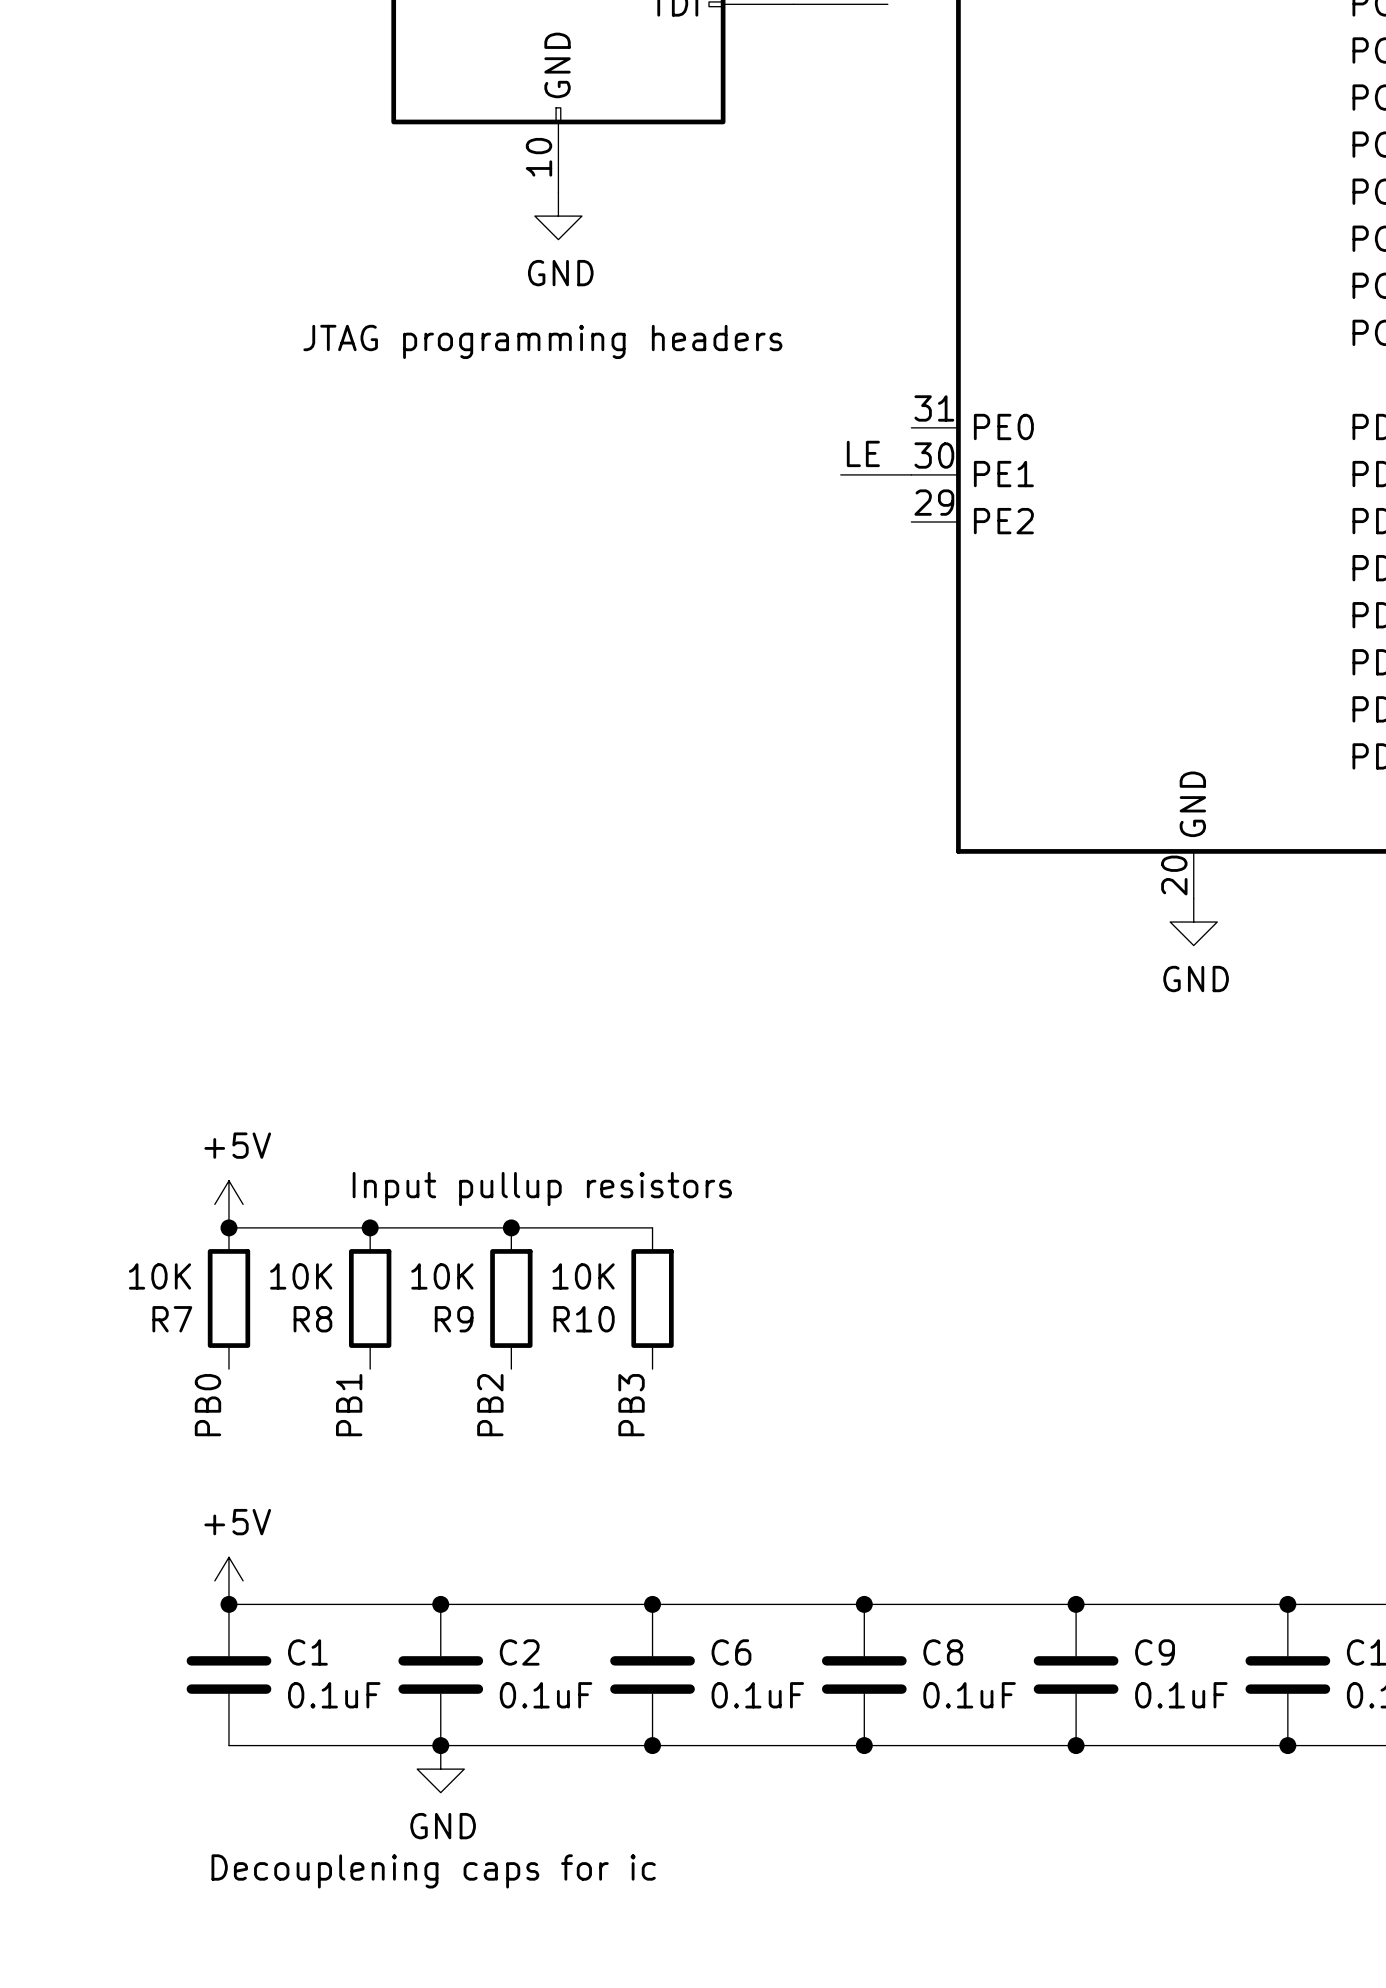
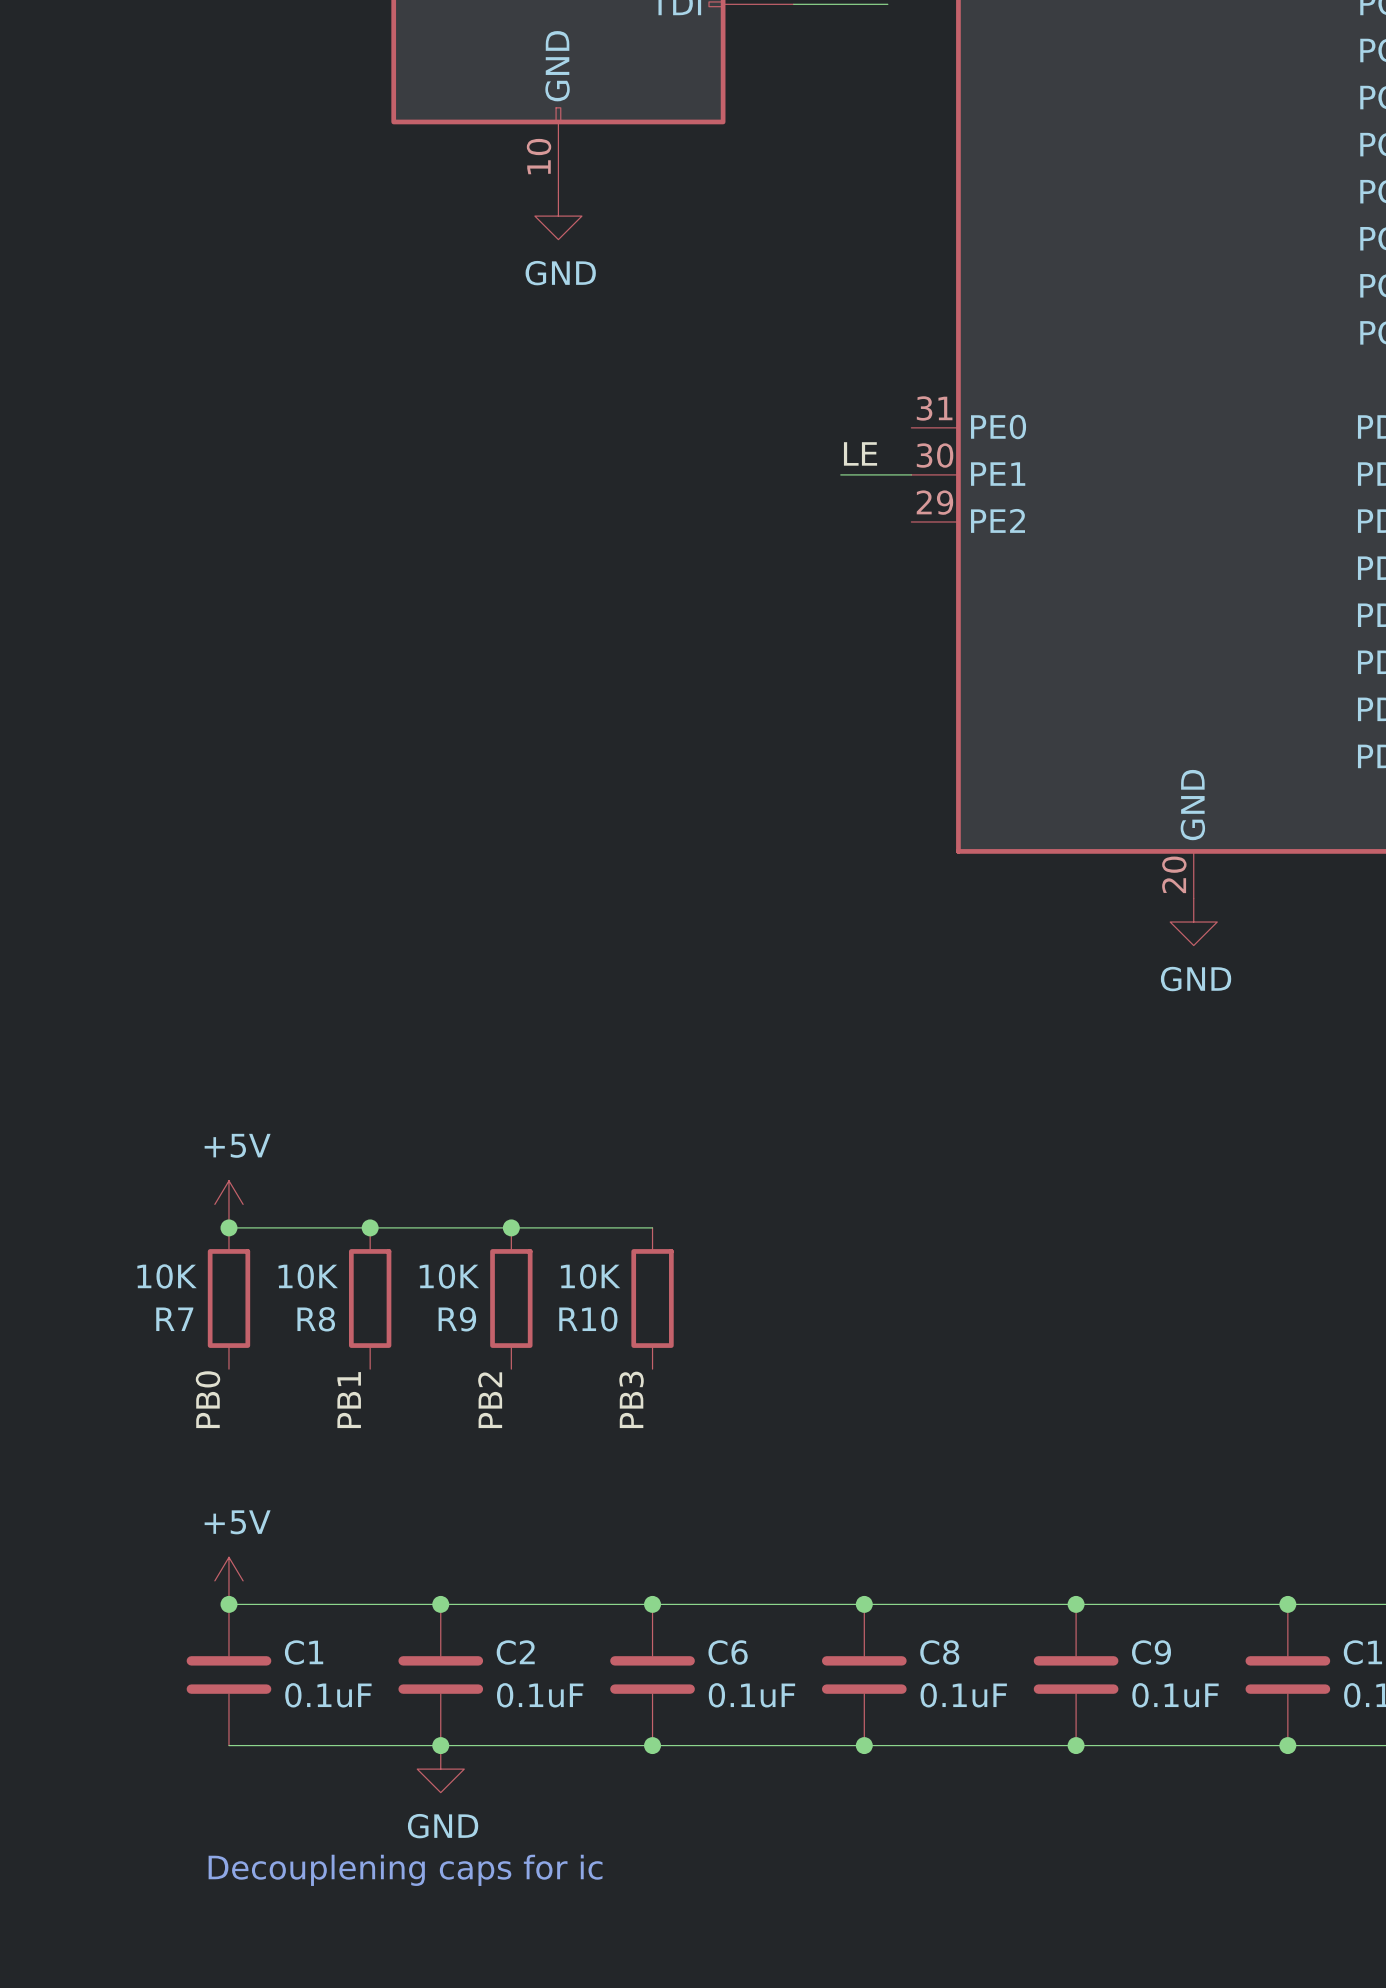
text: JTAG programming headers (542, 341) -> none
text: Input pullup resistors (542, 1189) -> none

